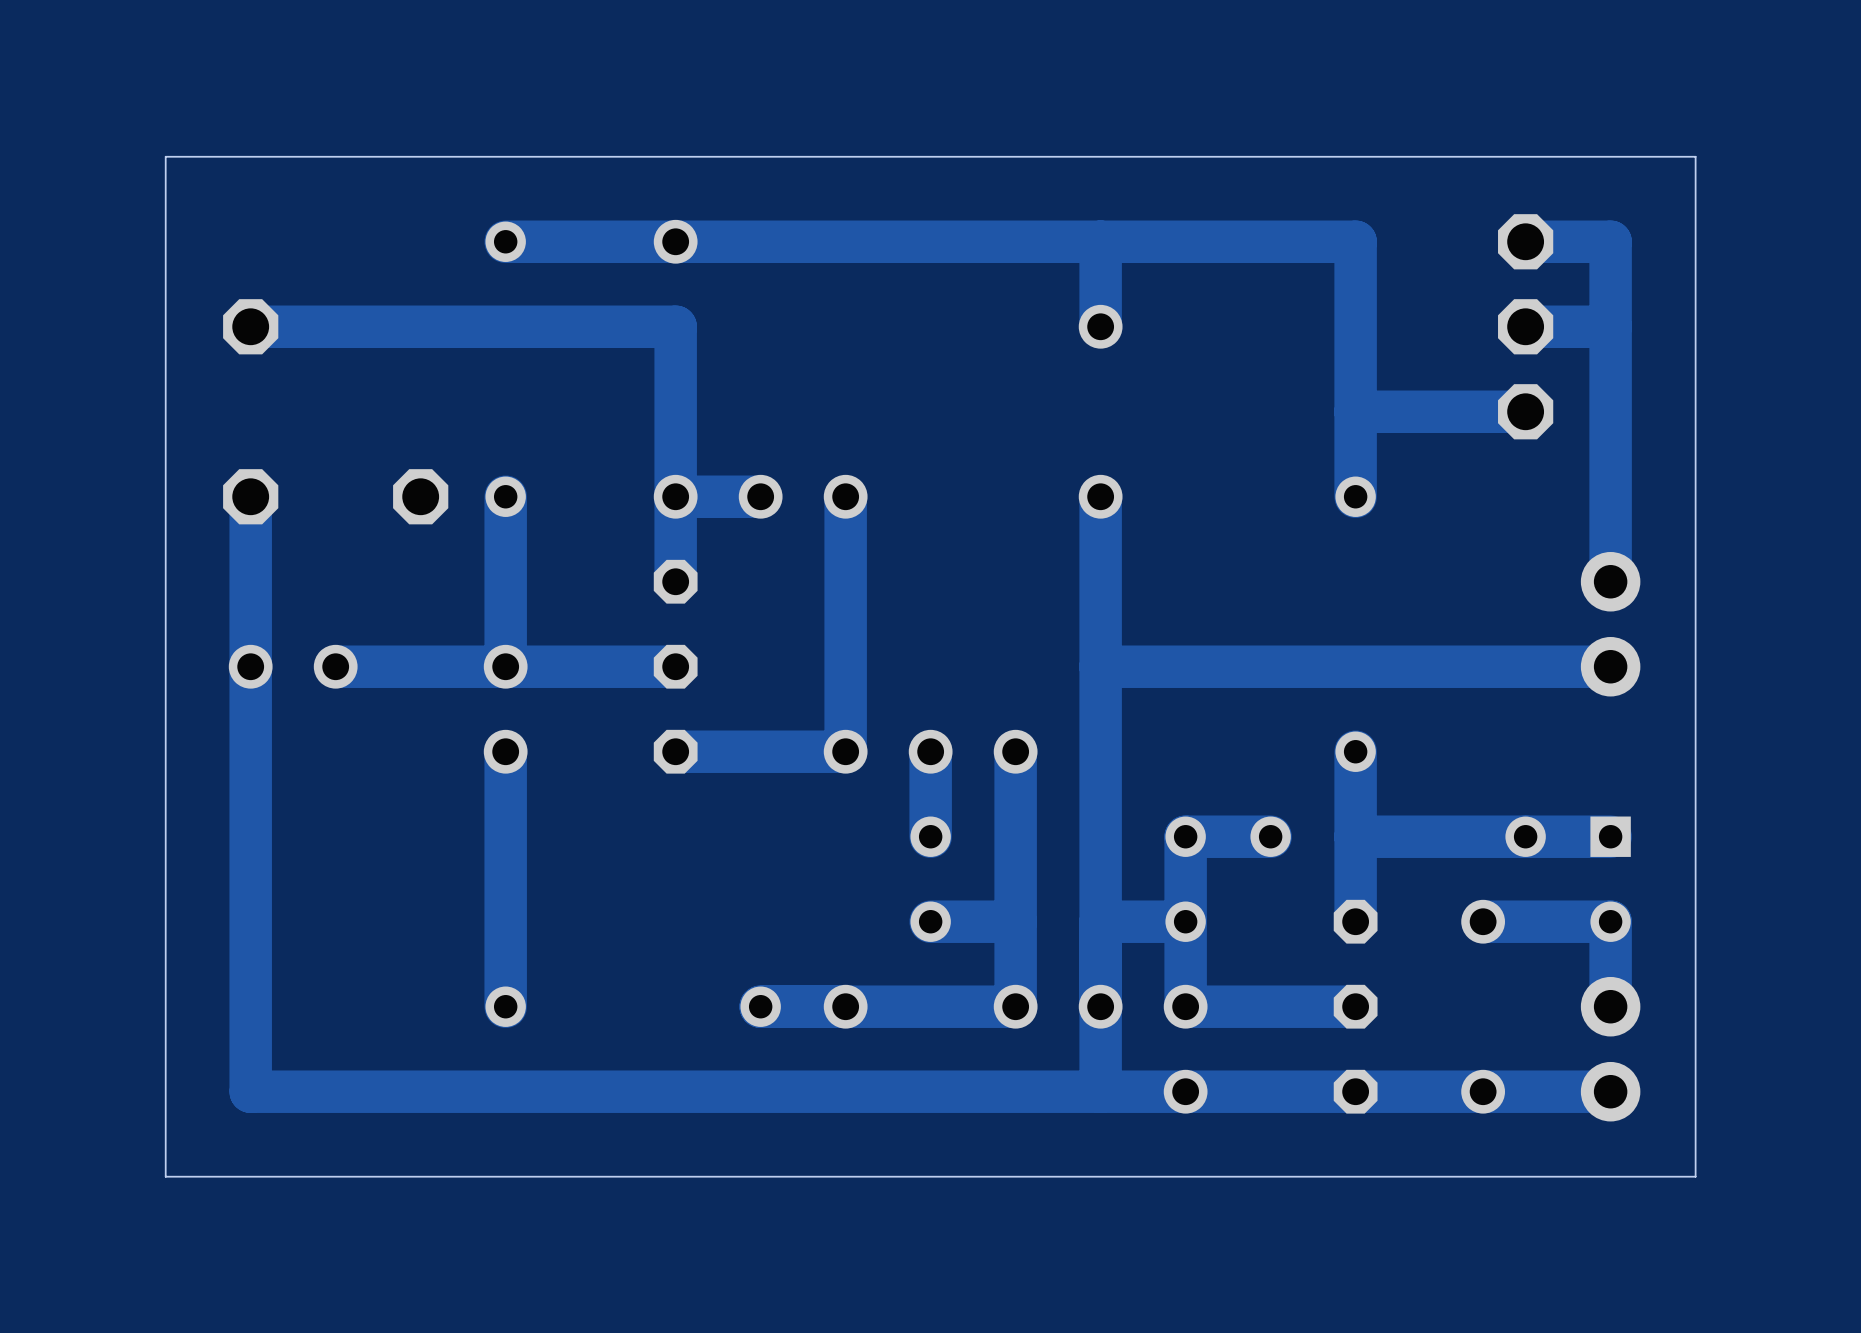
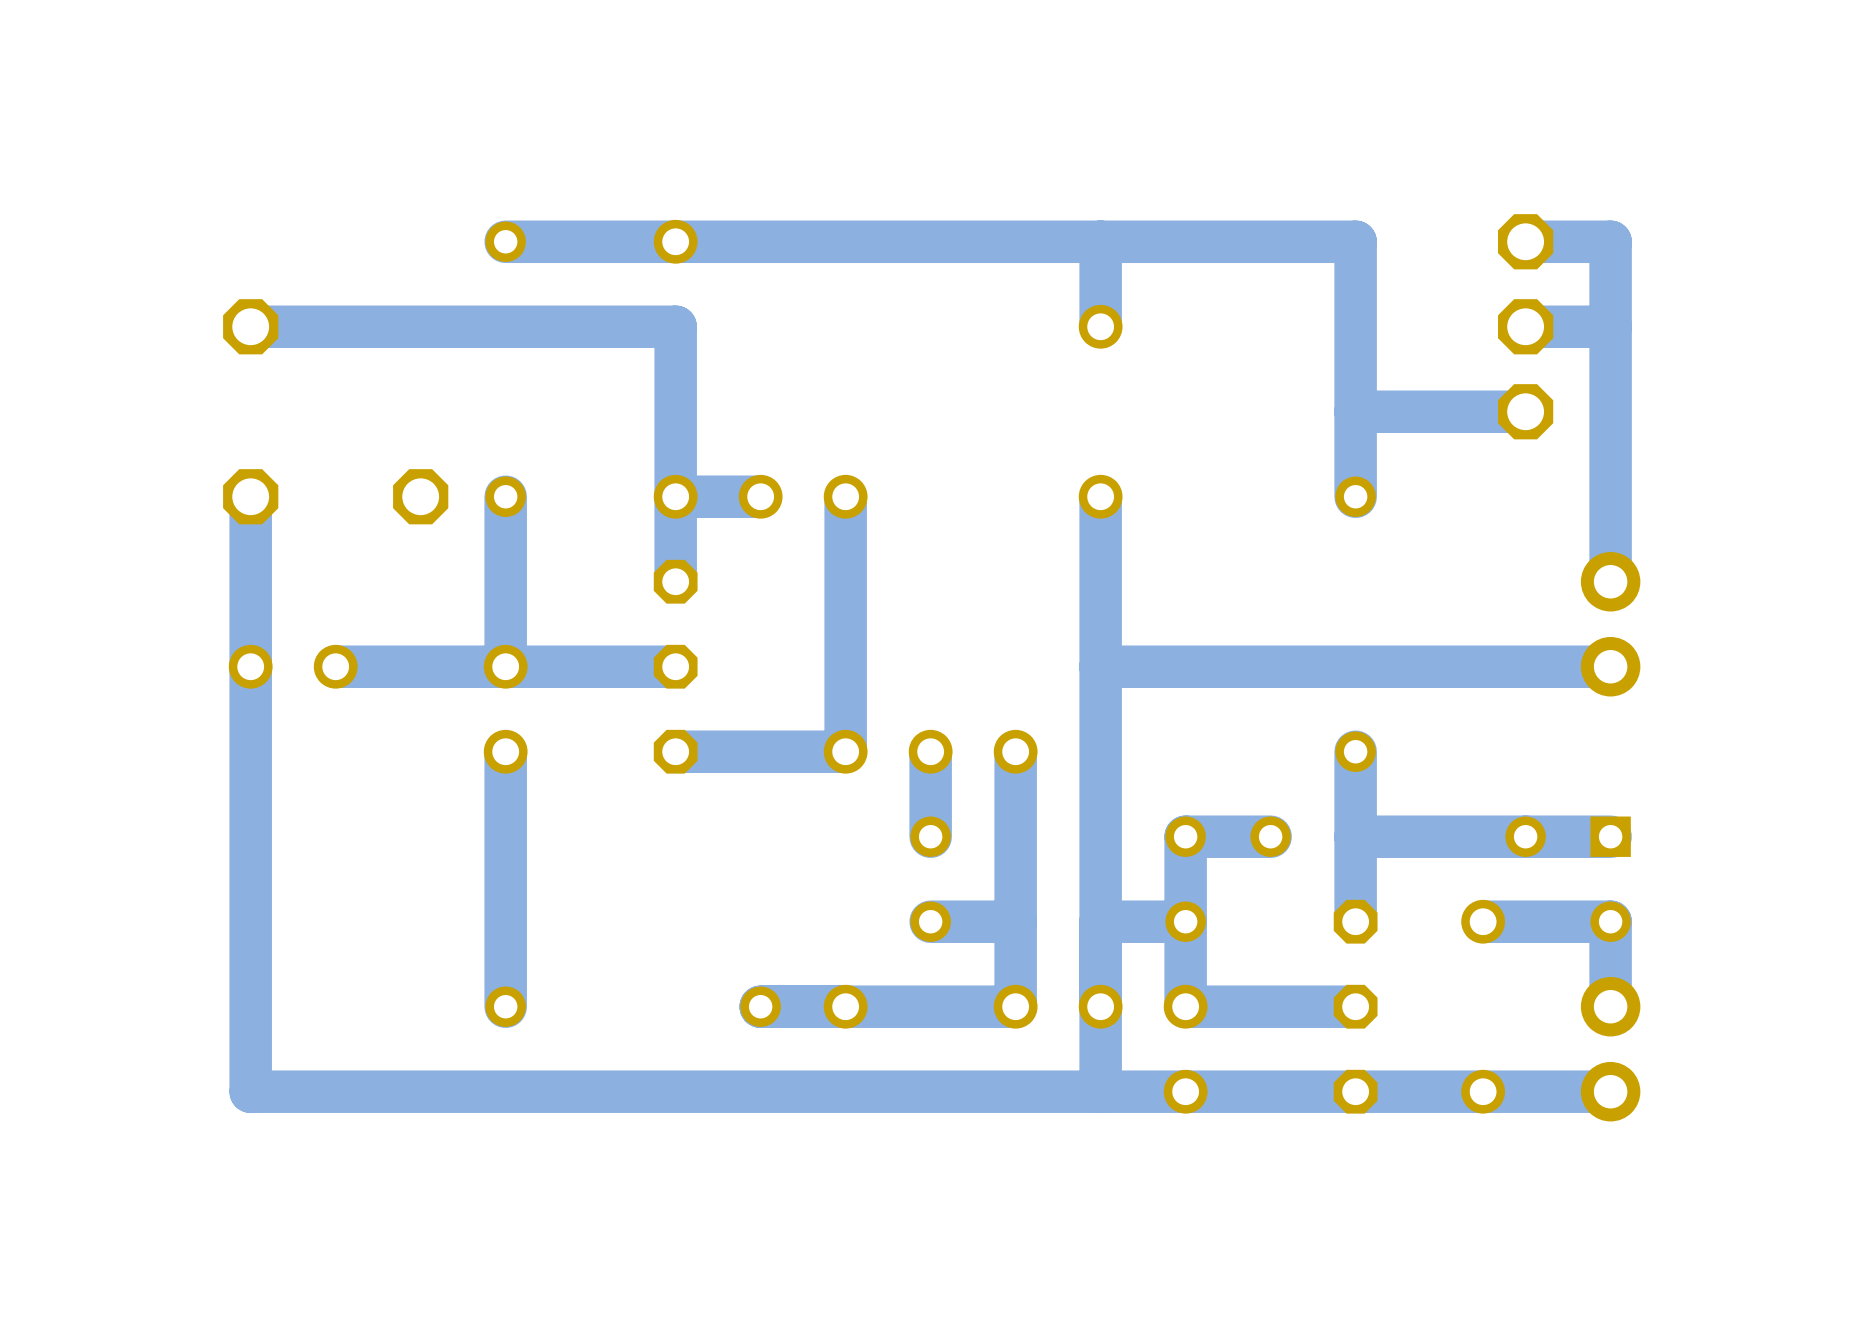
board edge: (1695, 156) (165, 156) (165, 1176) (1695, 1176) (1695, 156) -> none

